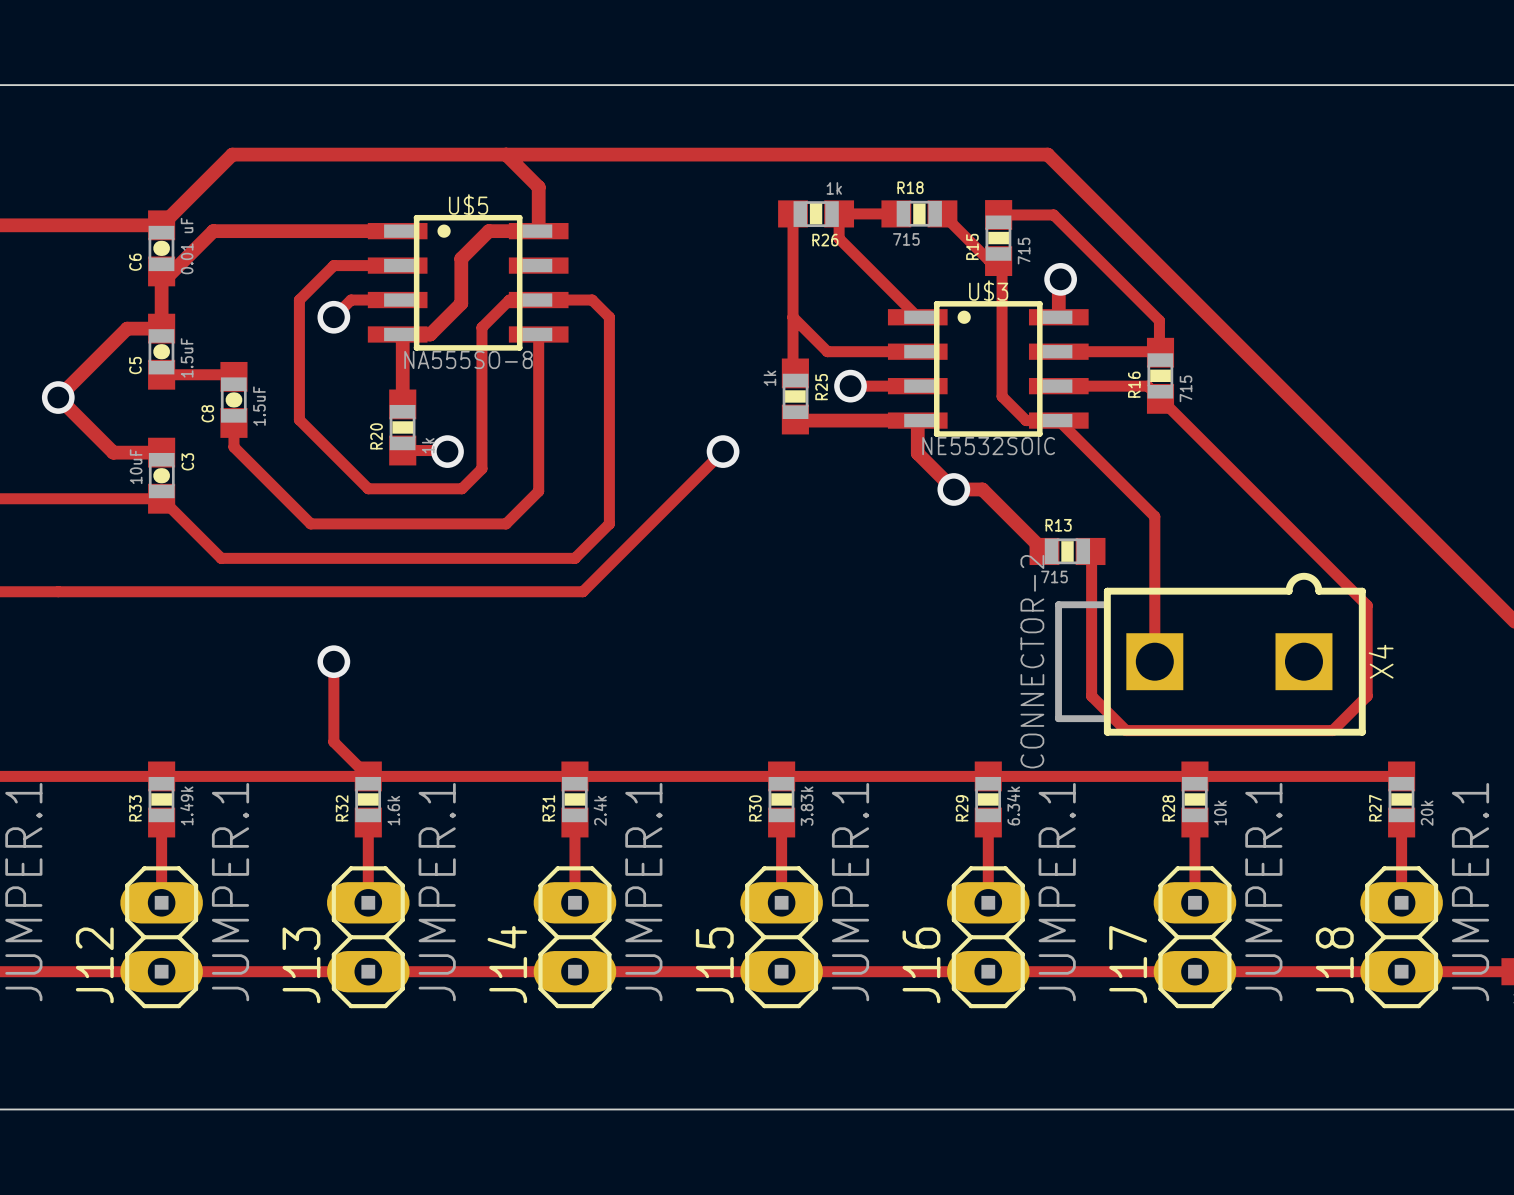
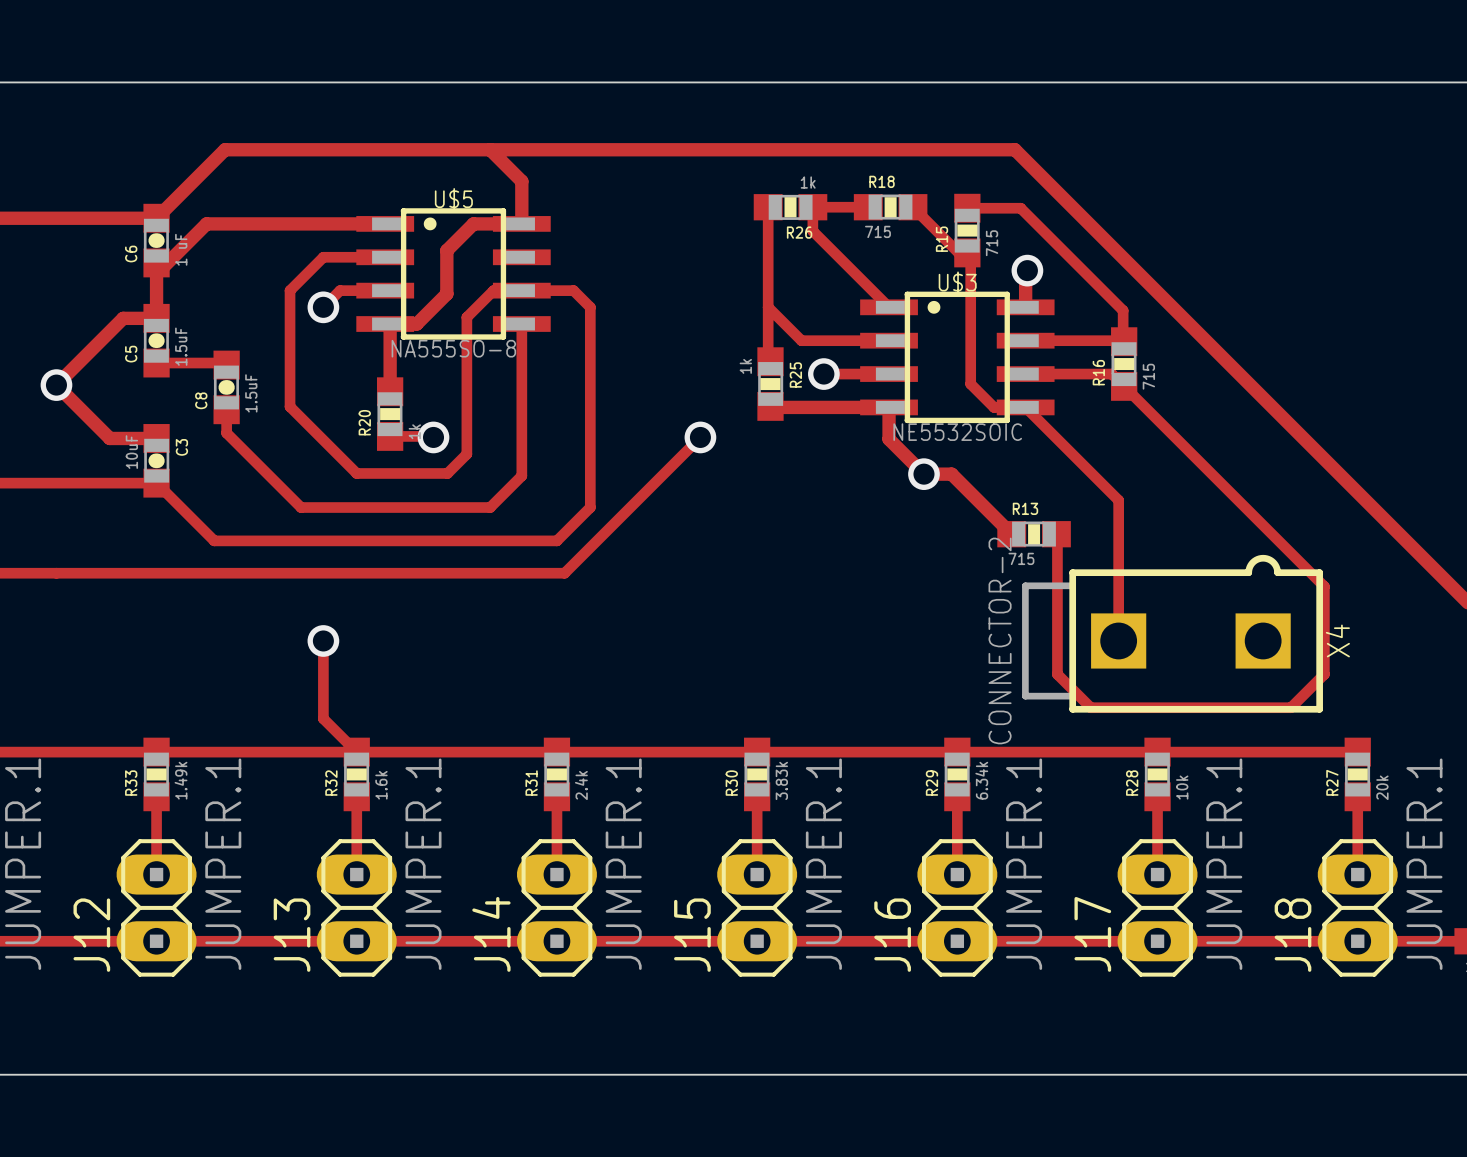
C6 value: 0.01 uF (187, 246) -> 1 uF (181, 249)

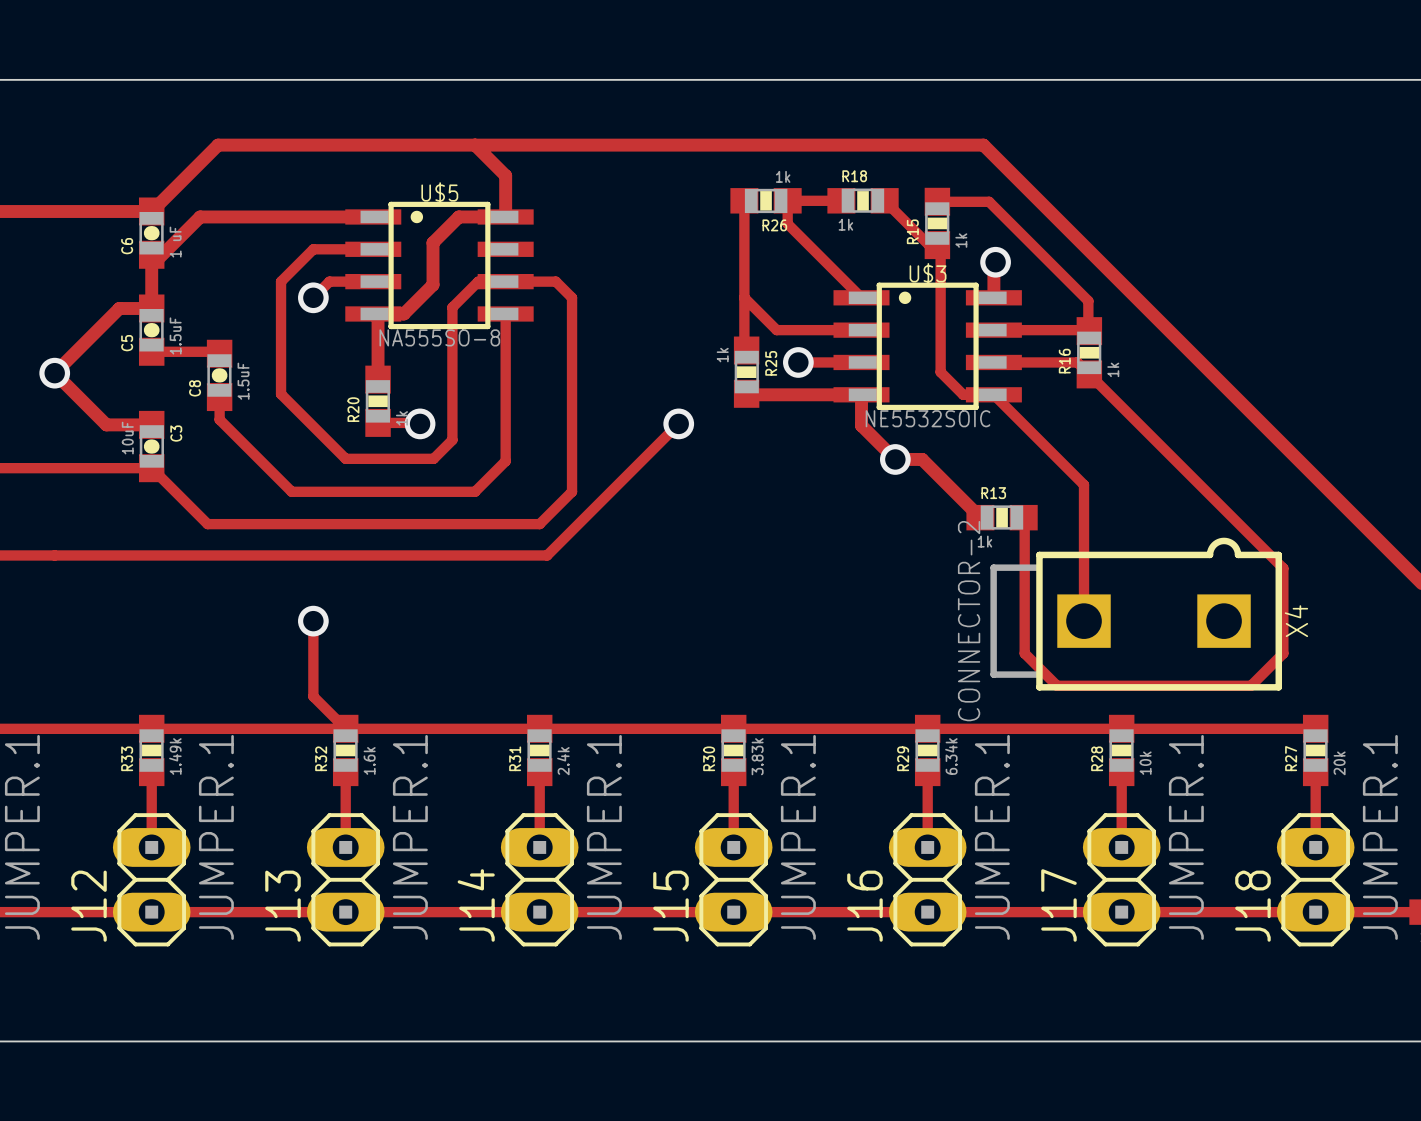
R18 value: 715 (877, 231) -> 1k (845, 224)
R15 value: 715 (992, 243) -> 1k (961, 240)
R16 value: 715 (1148, 376) -> 1k (1113, 369)
R13 value: 715 (1021, 558) -> 1k (984, 541)

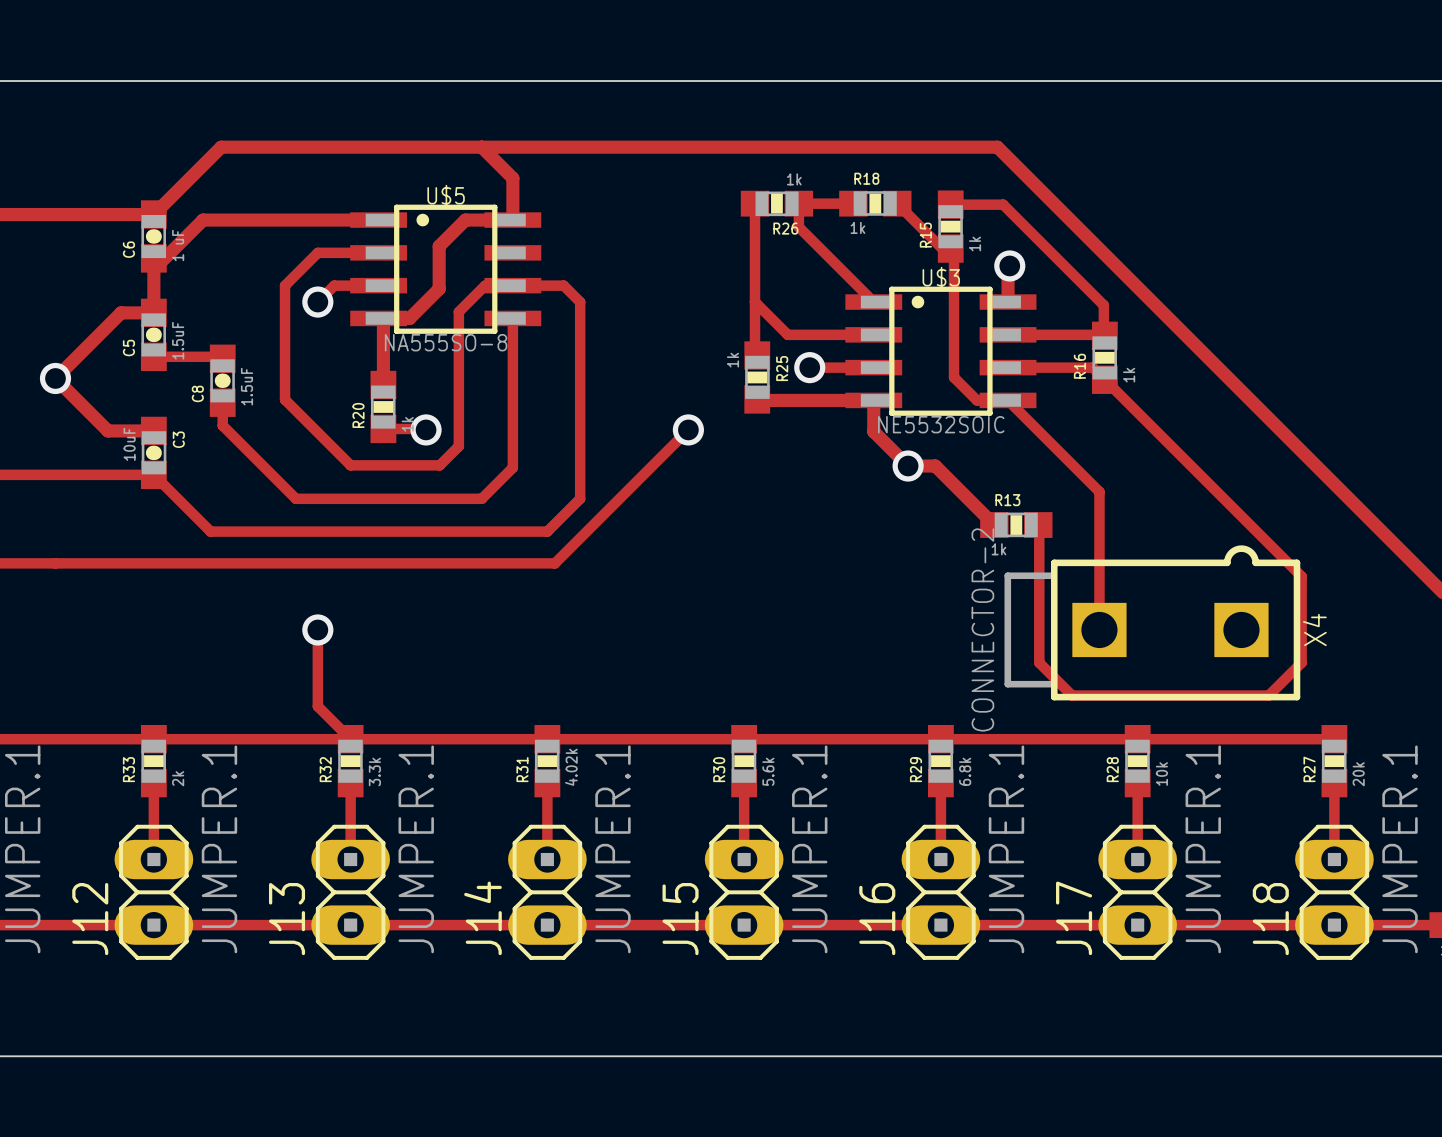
R33 value: 1.49k (175, 756) -> 2k (178, 778)
R30 value: 3.83k (757, 756) -> 5.6k (768, 771)
R29 value: 6.34k (951, 756) -> 6.8k (965, 771)
R32 value: 1.6k (369, 760) -> 3.3k (374, 771)
R31 value: 2.4k (563, 761) -> 4.02k (571, 767)

